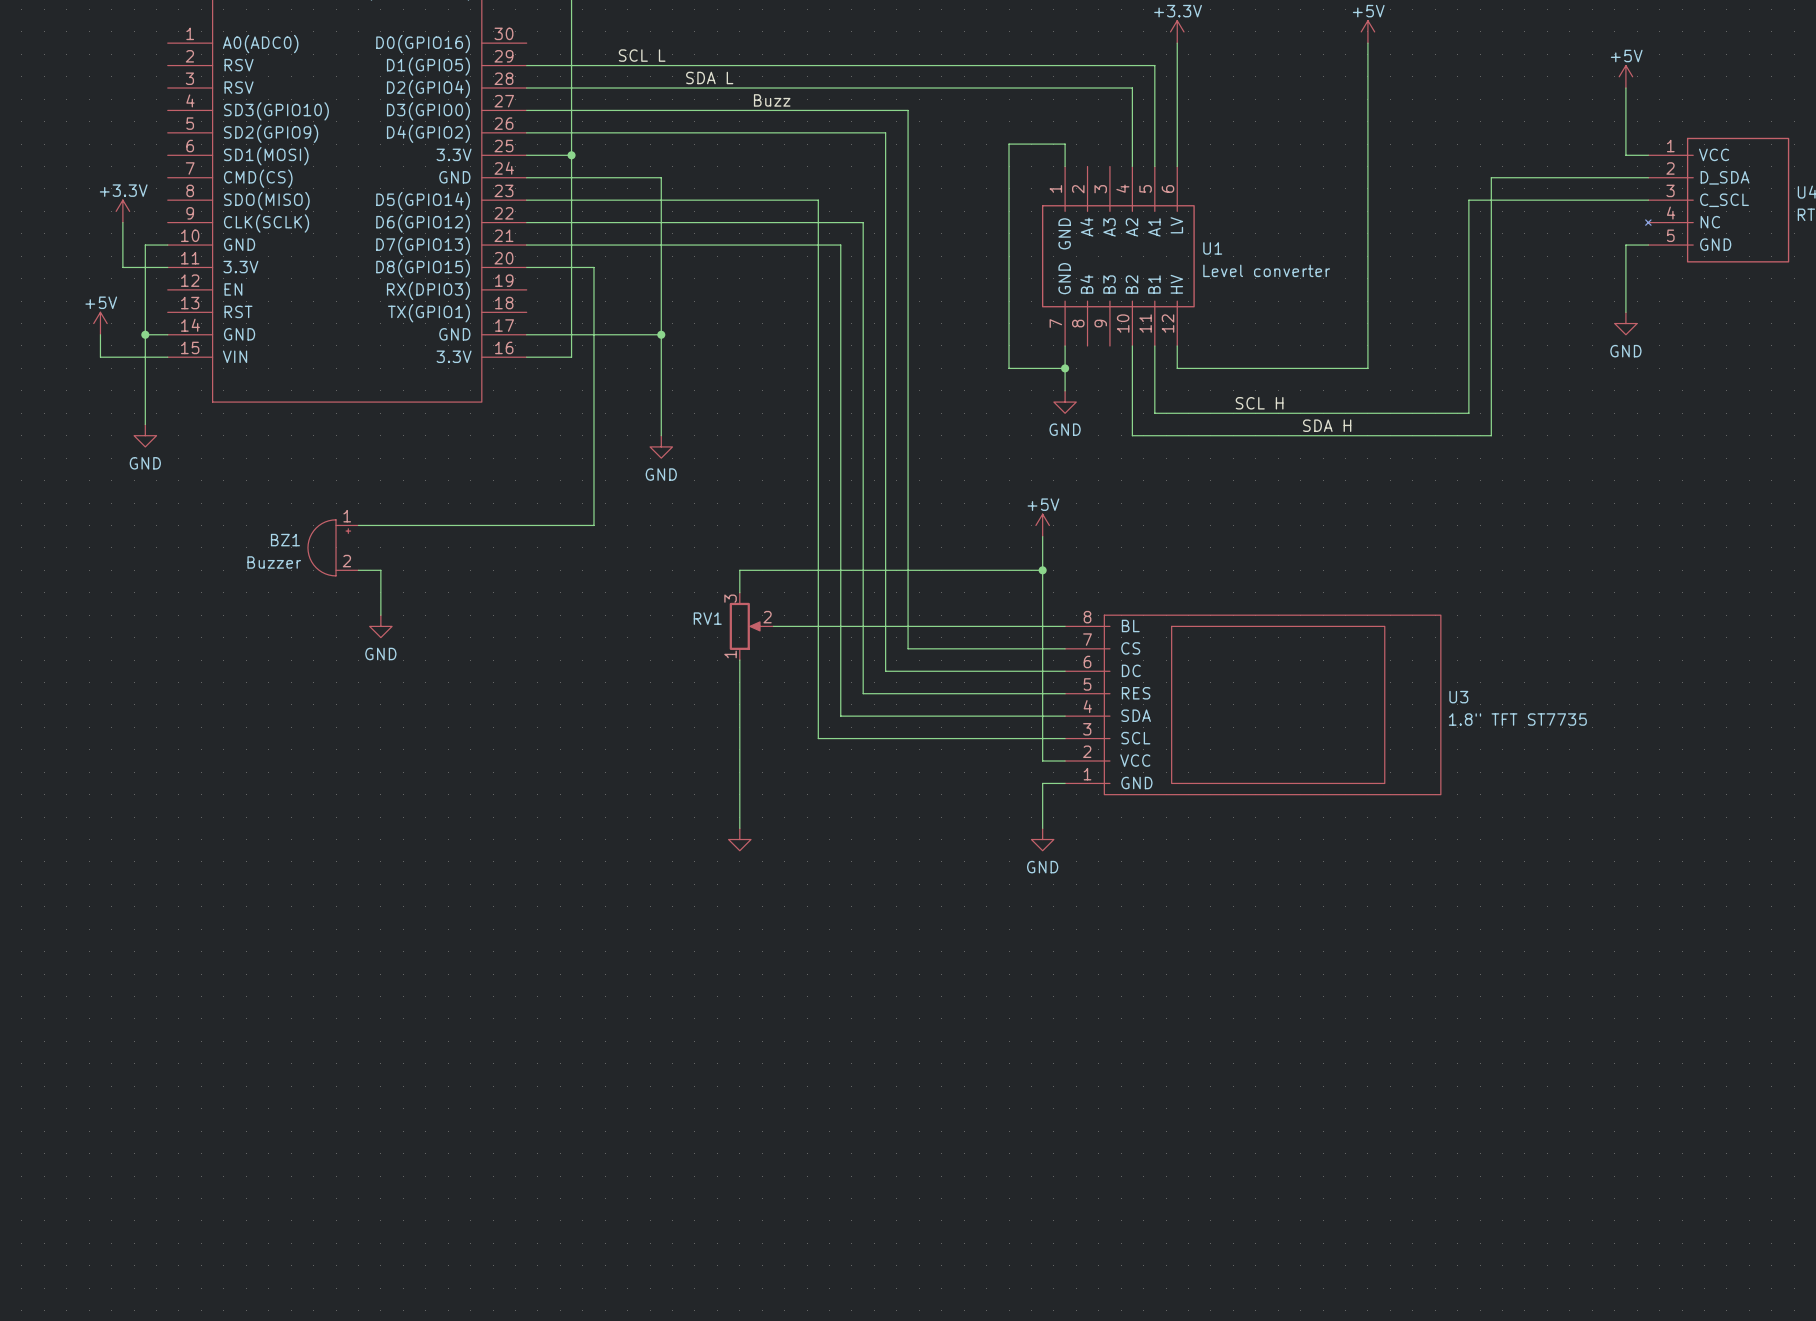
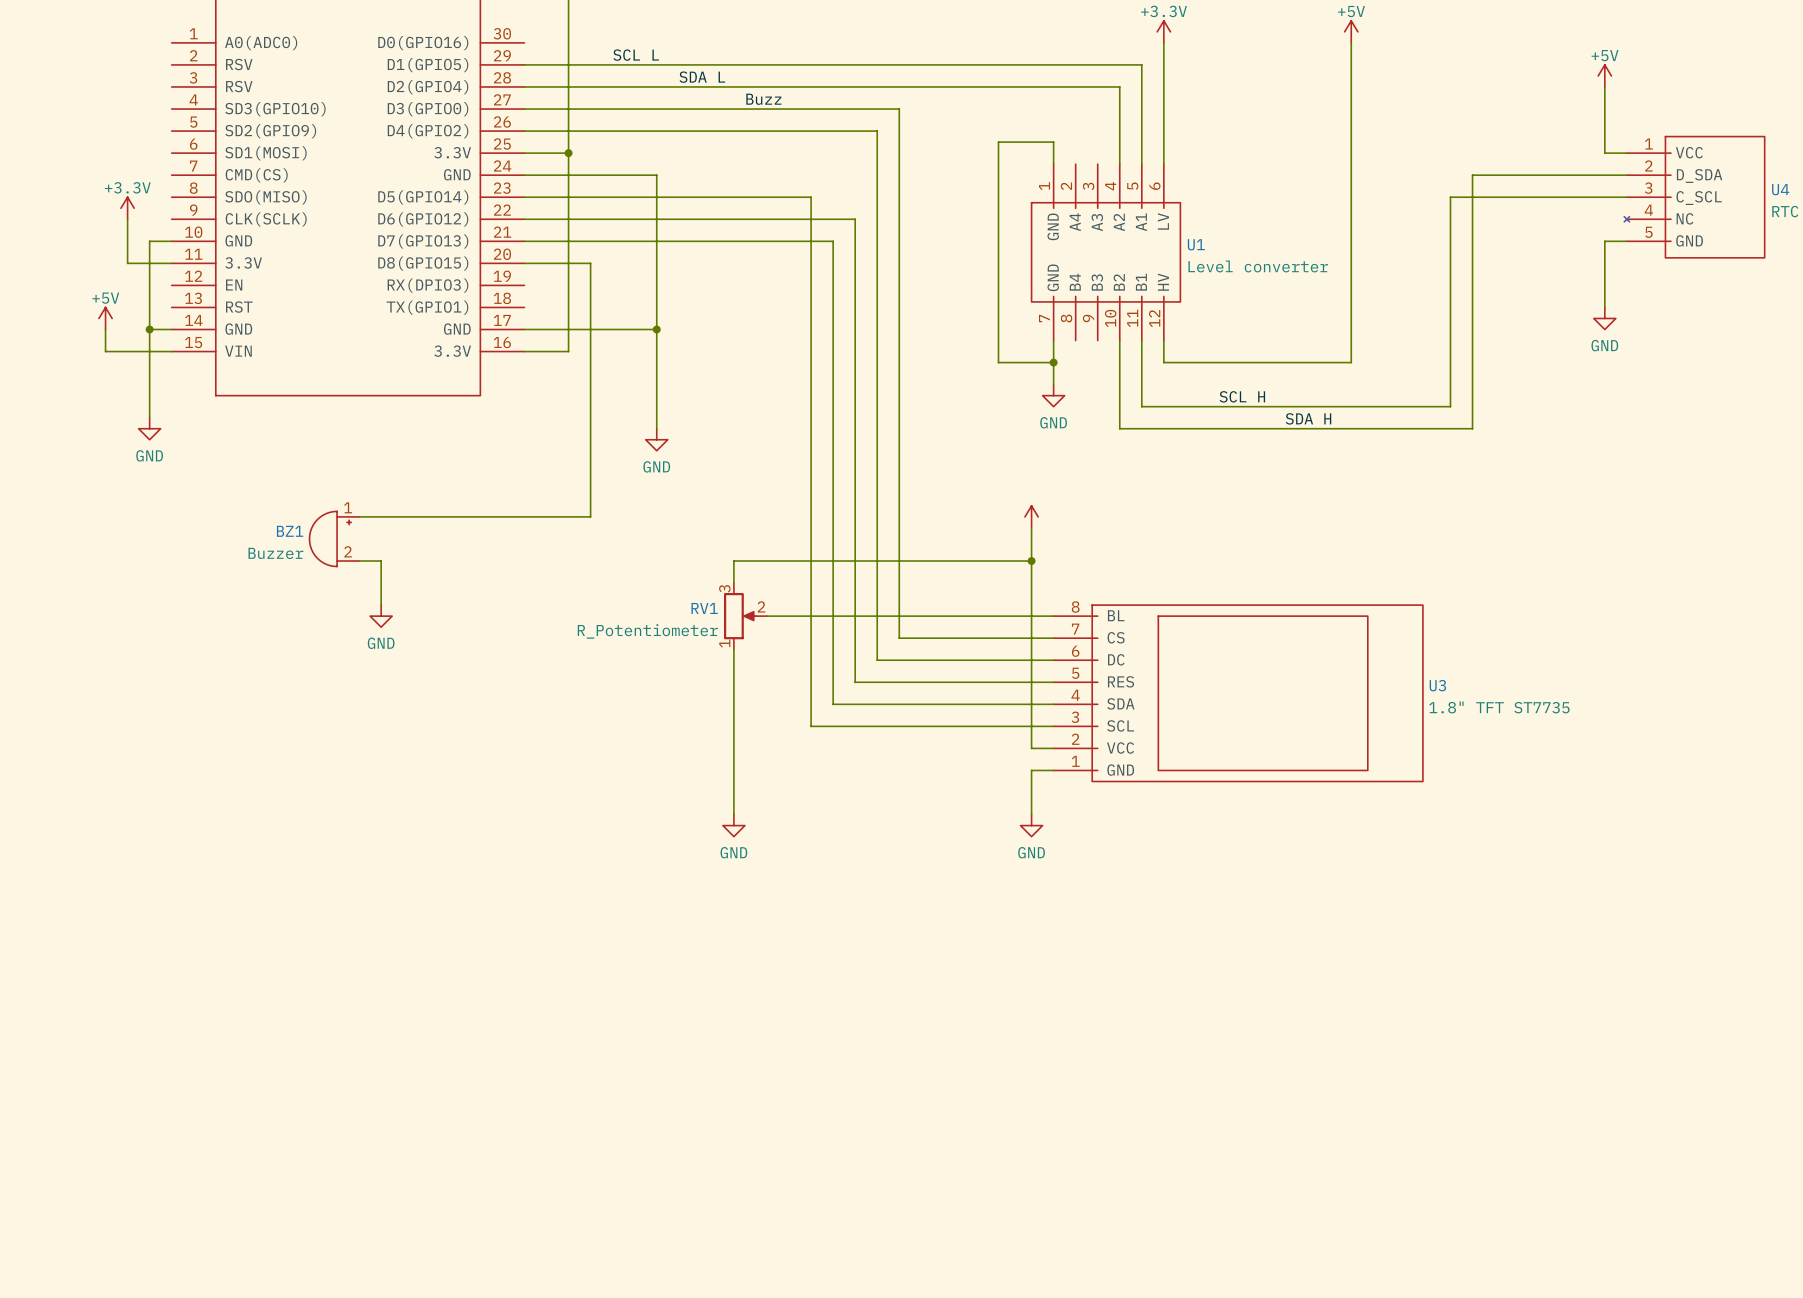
power symbol text: +5V (1043, 504) -> none
RV1 value: none -> R_Potentiometer (647, 631)
power symbol text: none -> GND (733, 852)

